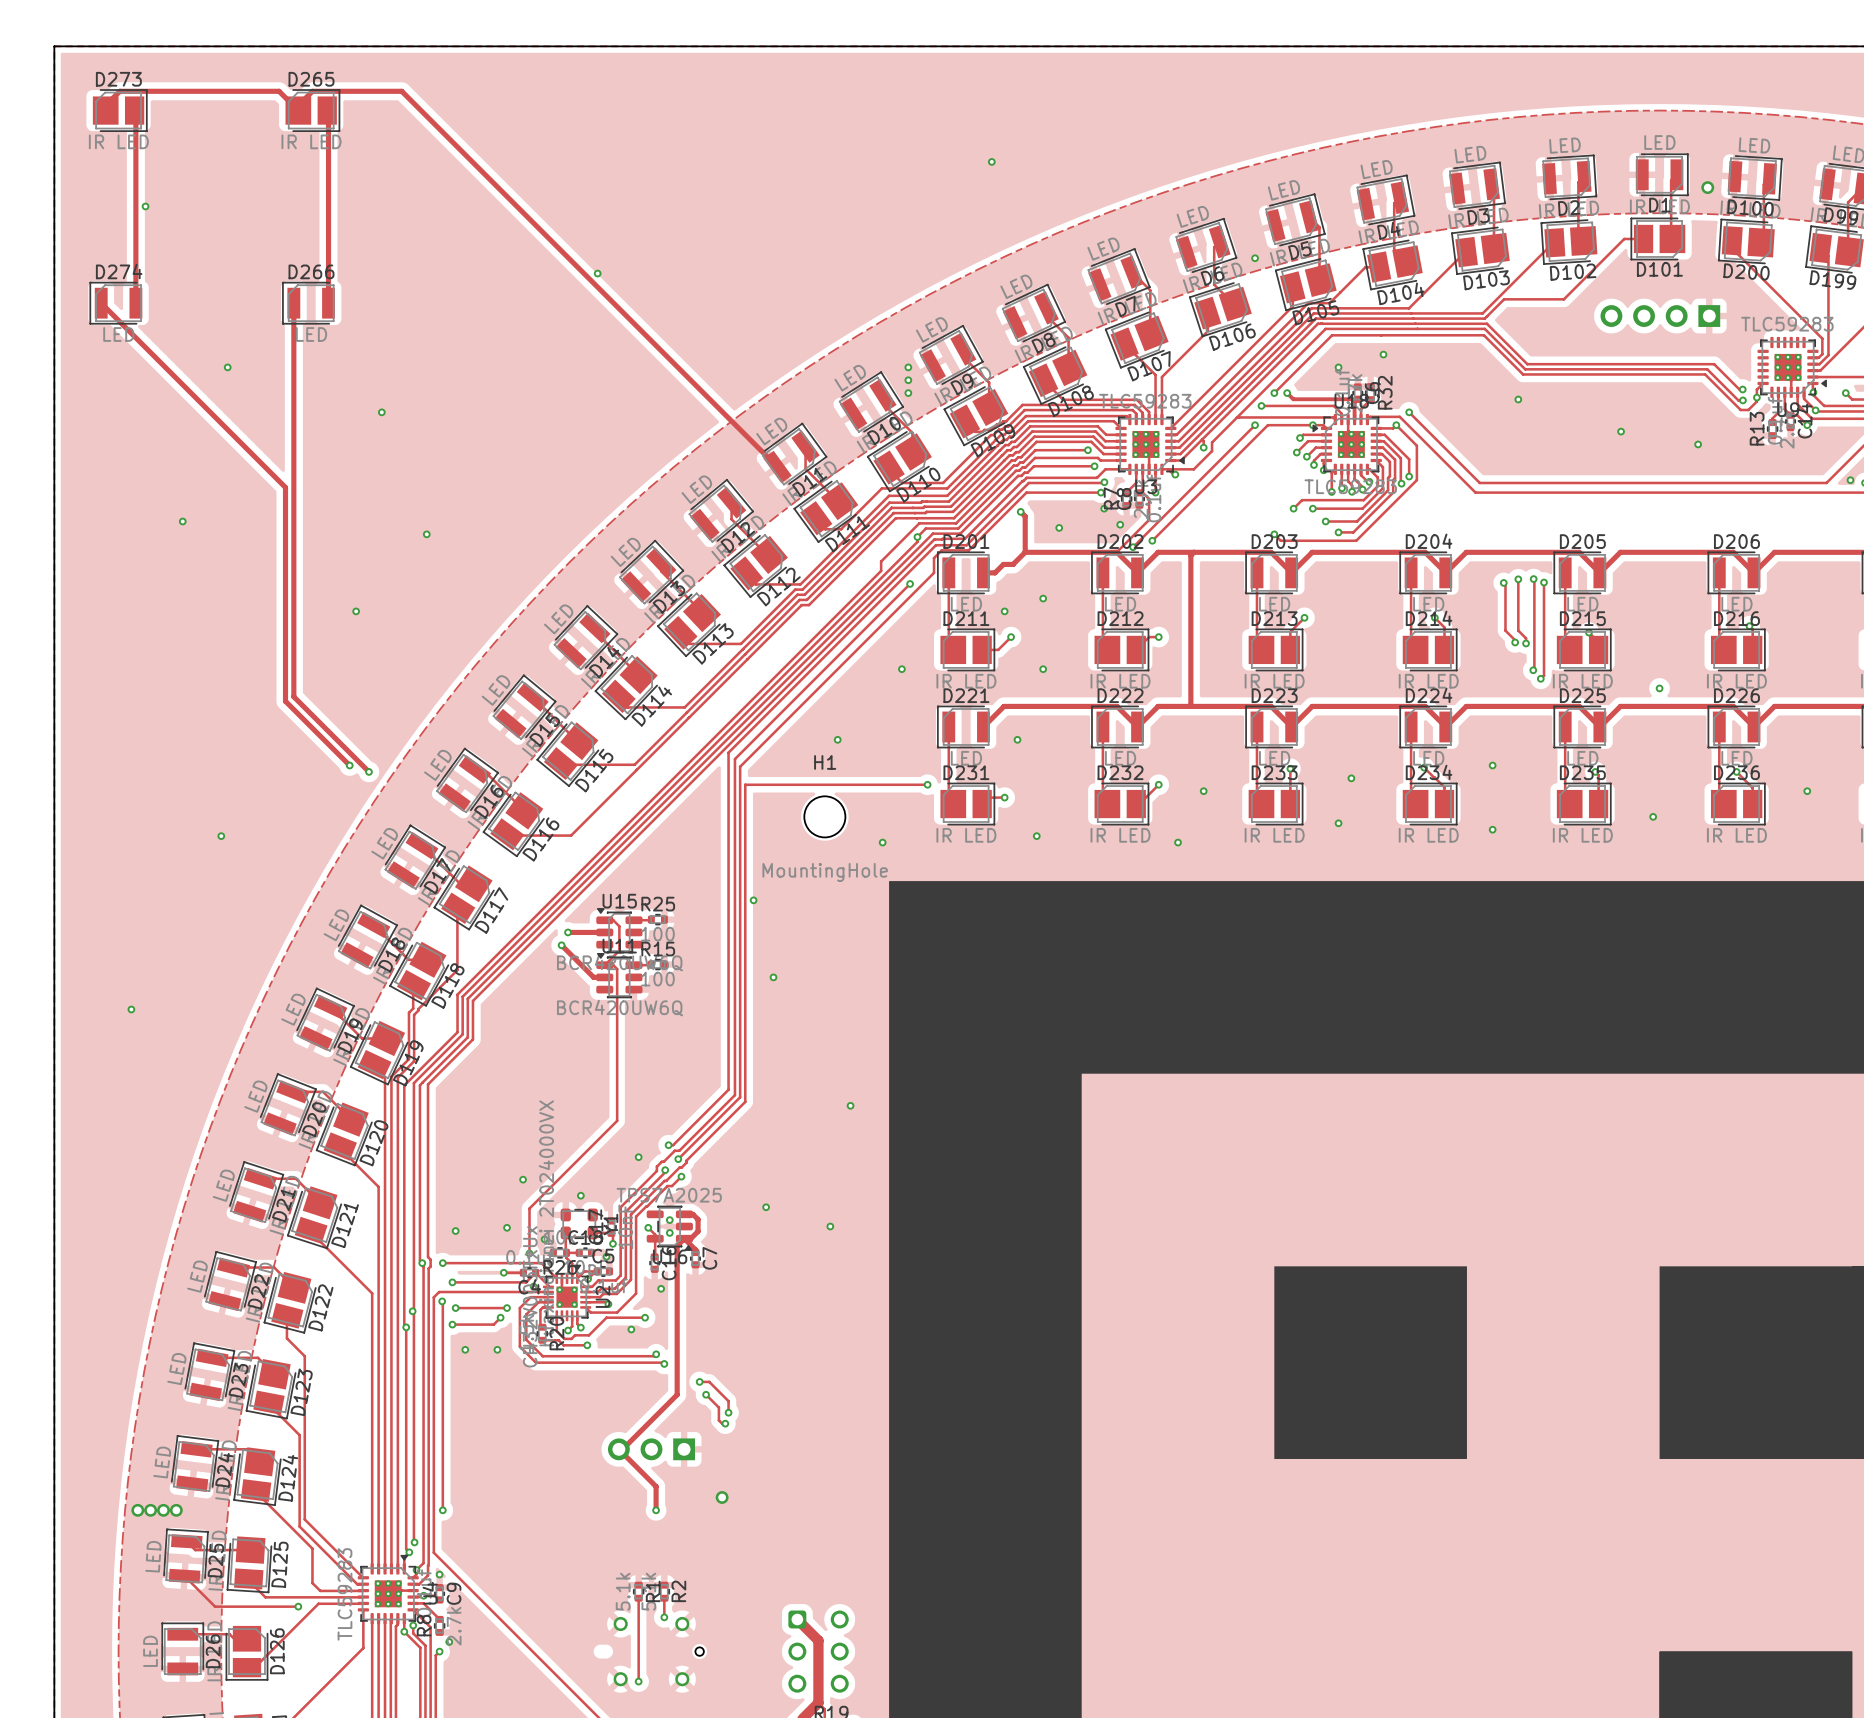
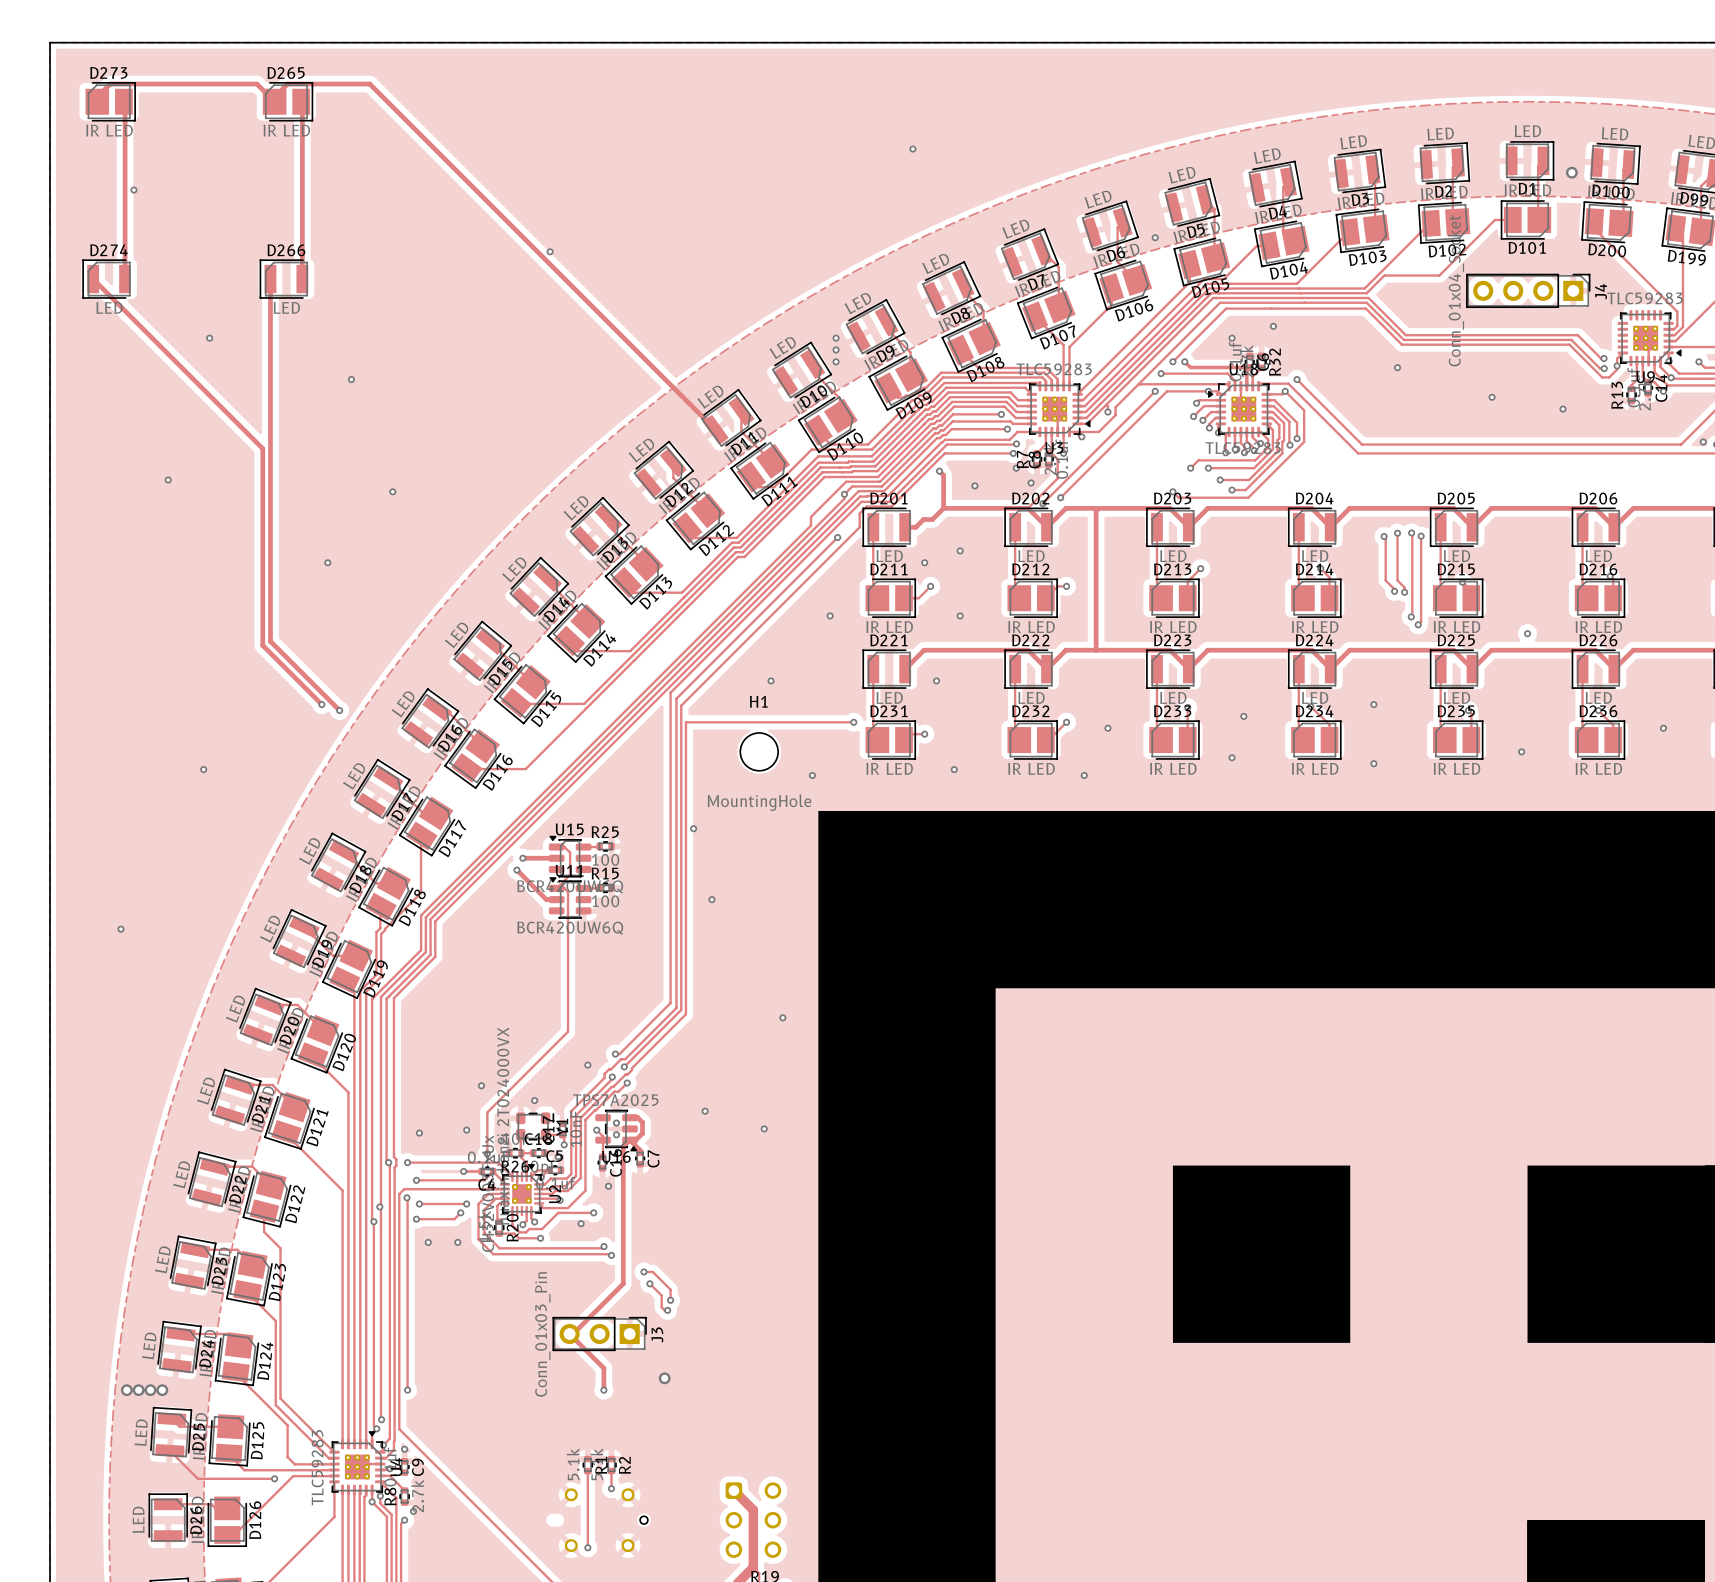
J4 side: bottom (1660, 316) -> top (1528, 290)
J3 side: bottom (651, 1449) -> top (599, 1334)

